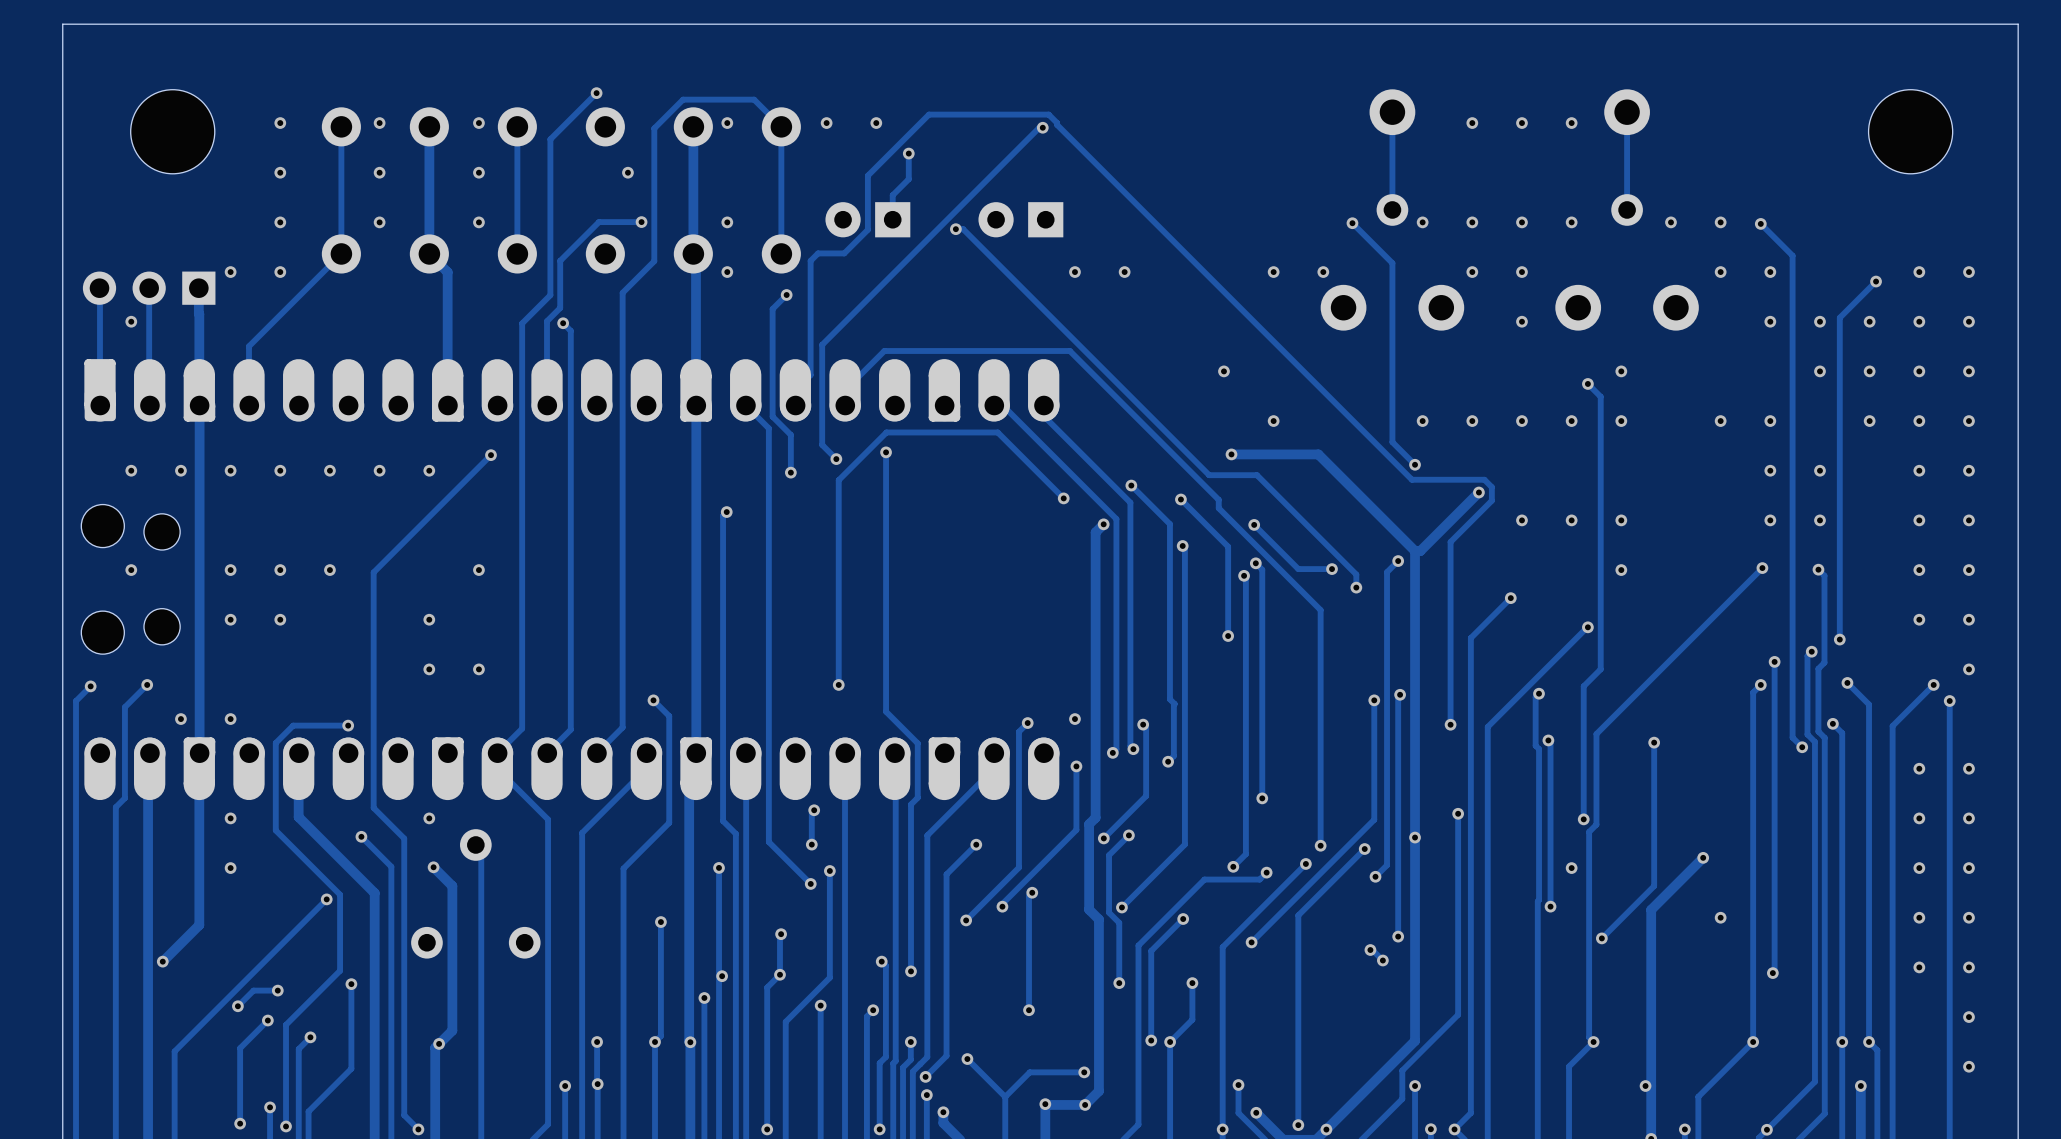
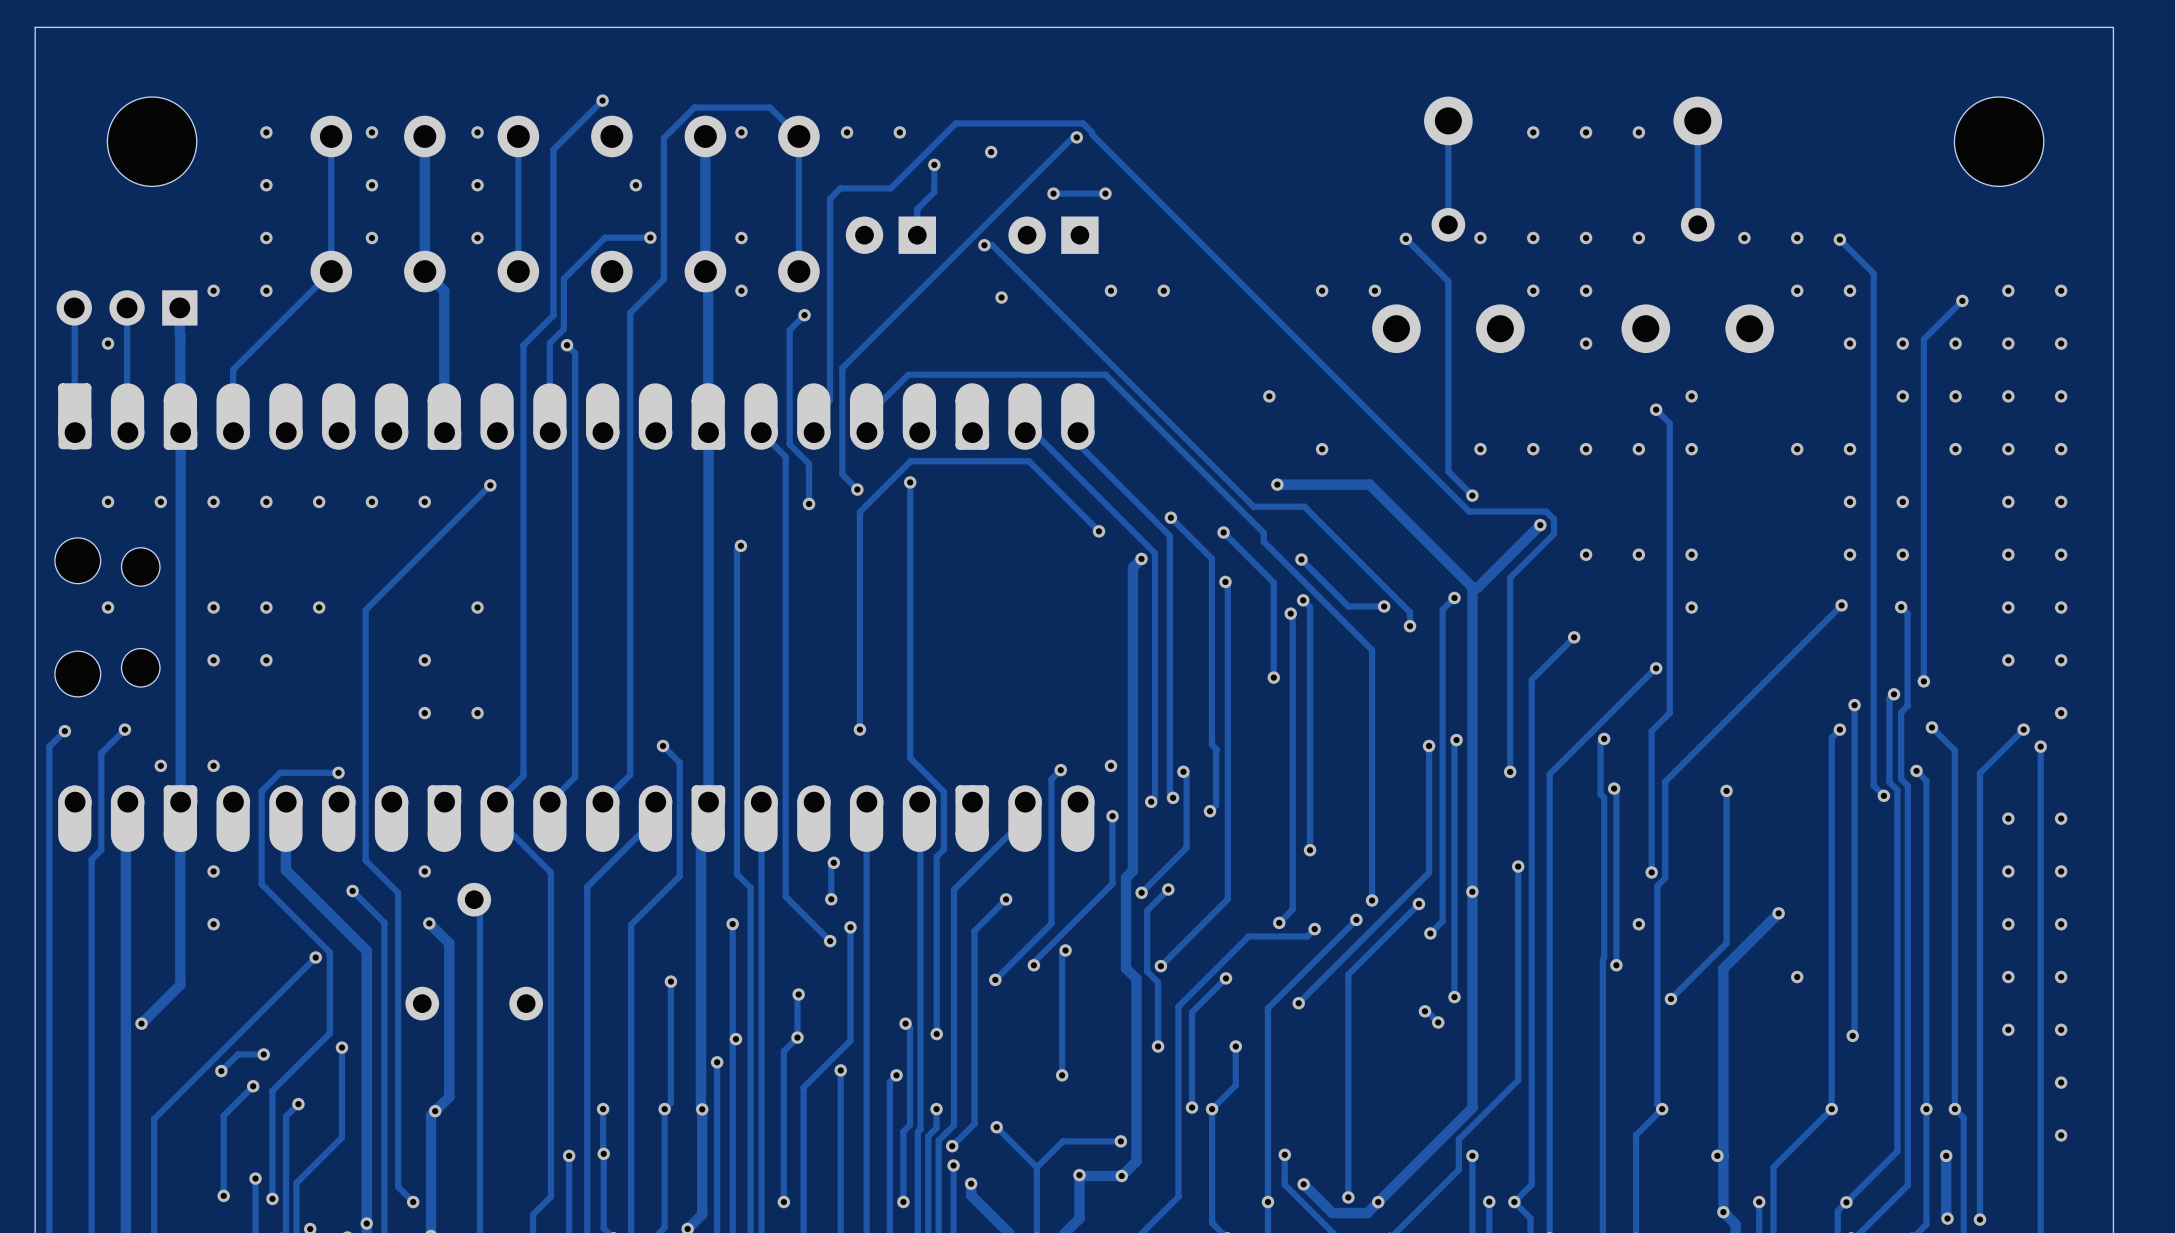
via: none -> (991, 152)
track: (867, 175) (867, 229) (844, 253) (818, 253) (810, 260) -> (890, 188) (840, 188) (830, 198) (830, 278)
via: none -> (1053, 193)
track: none -> (1105, 193) (1053, 193)
via: none -> (1105, 193)
via: none -> (1001, 297)

